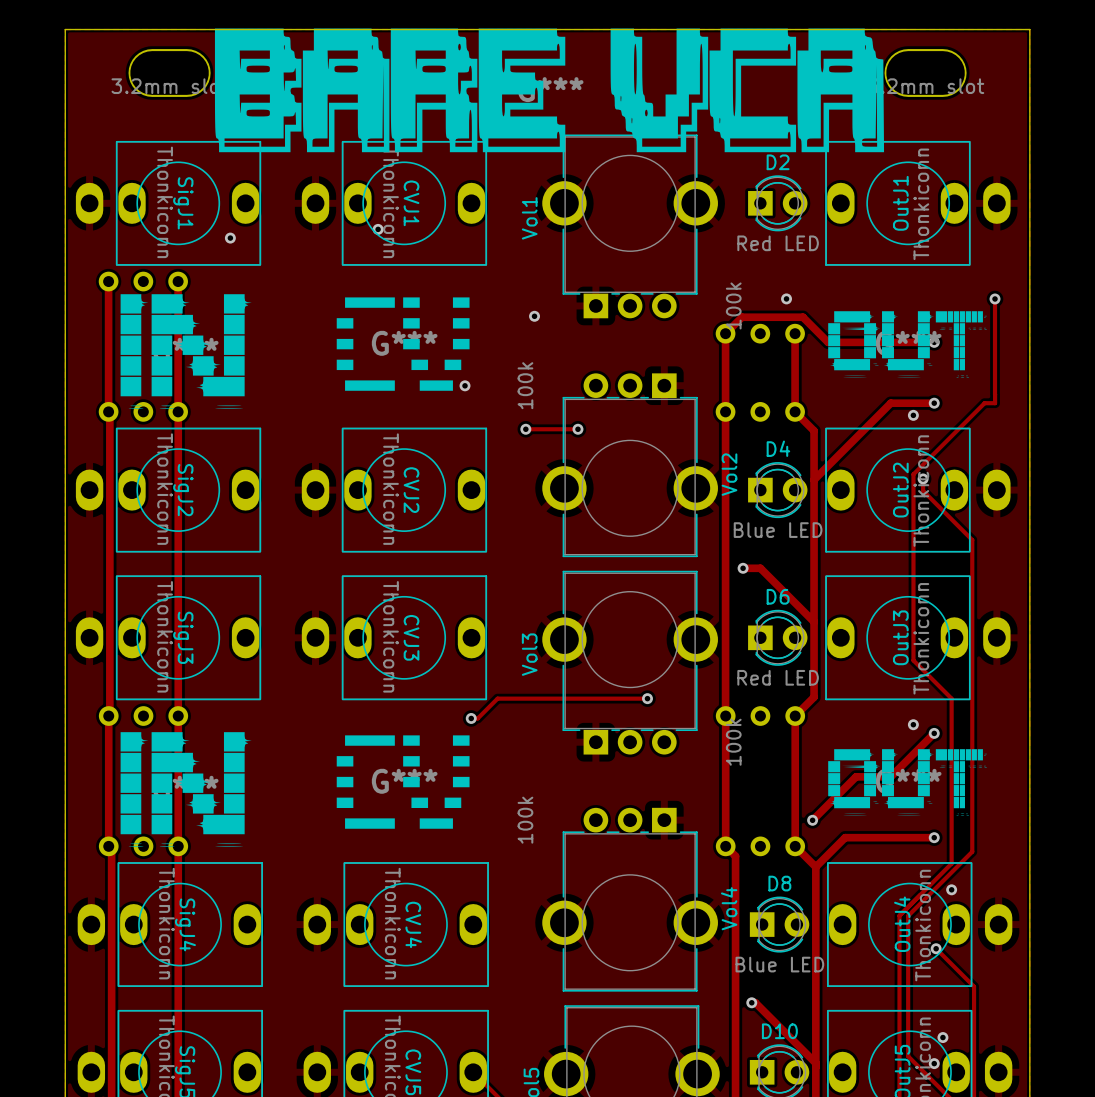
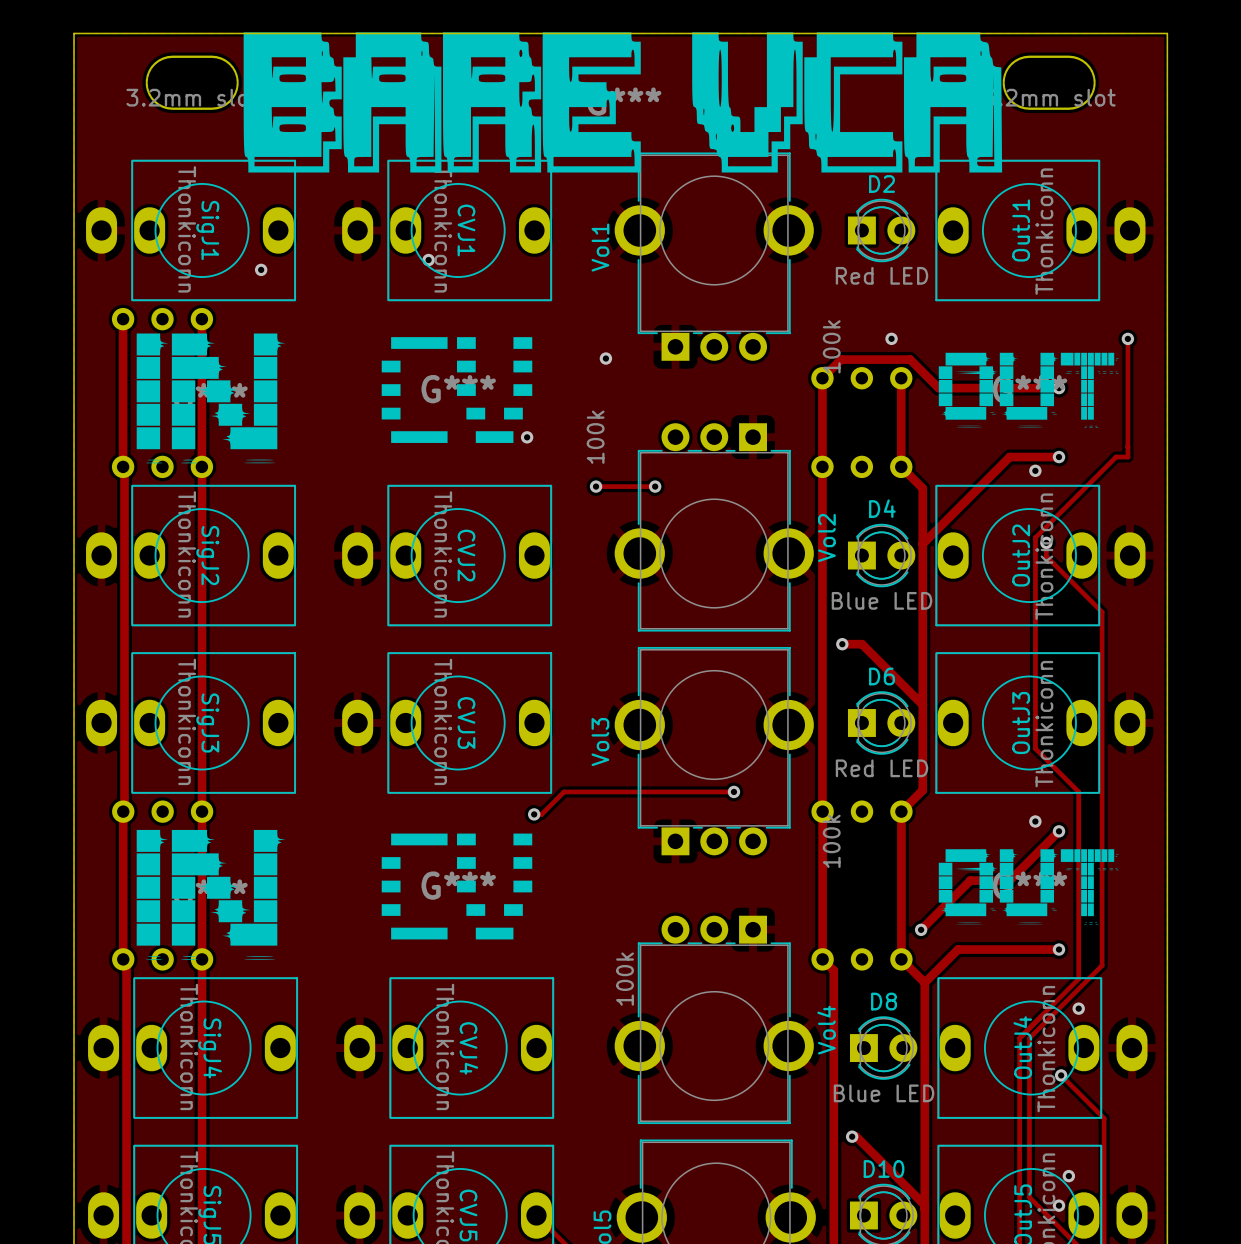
Vol4 value position: 100k (525, 820) -> 100k (625, 979)

